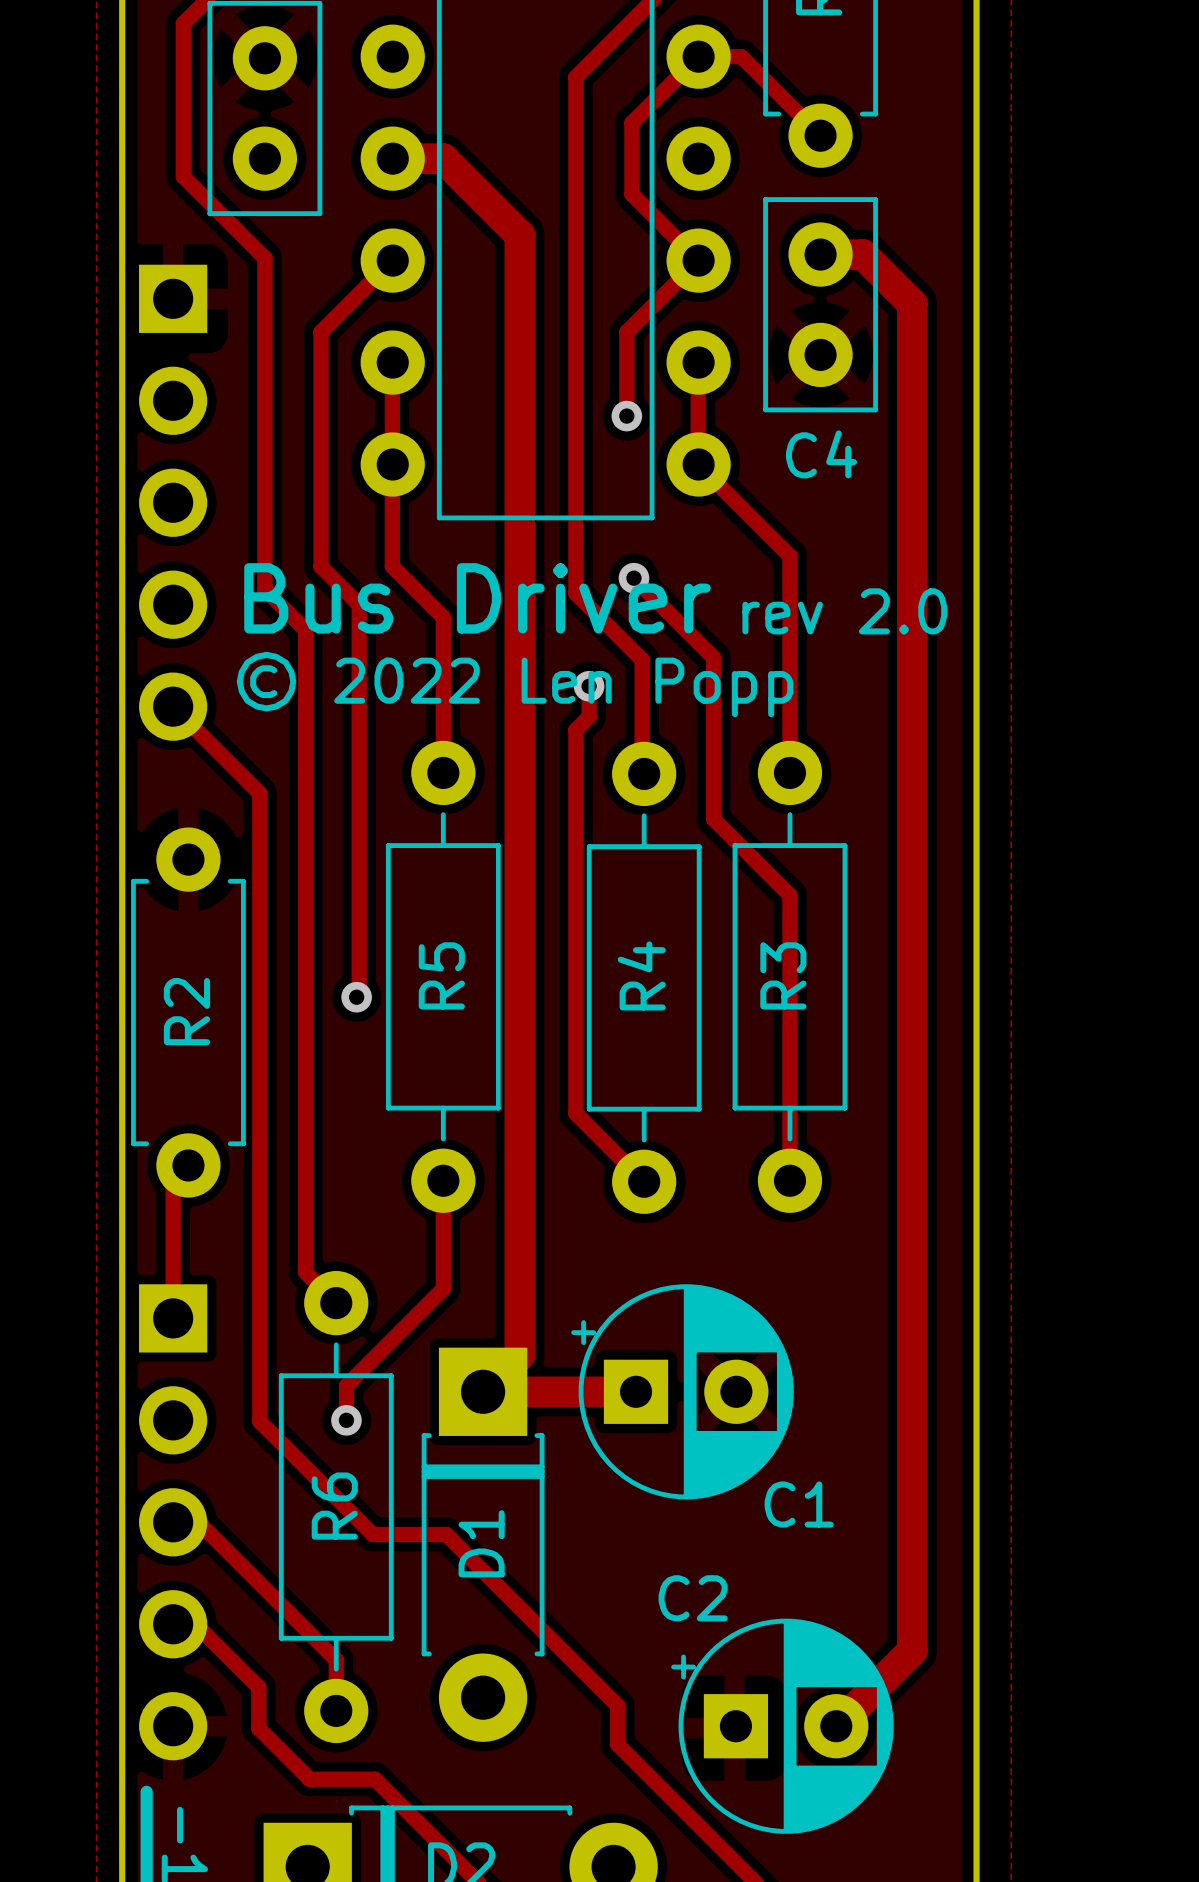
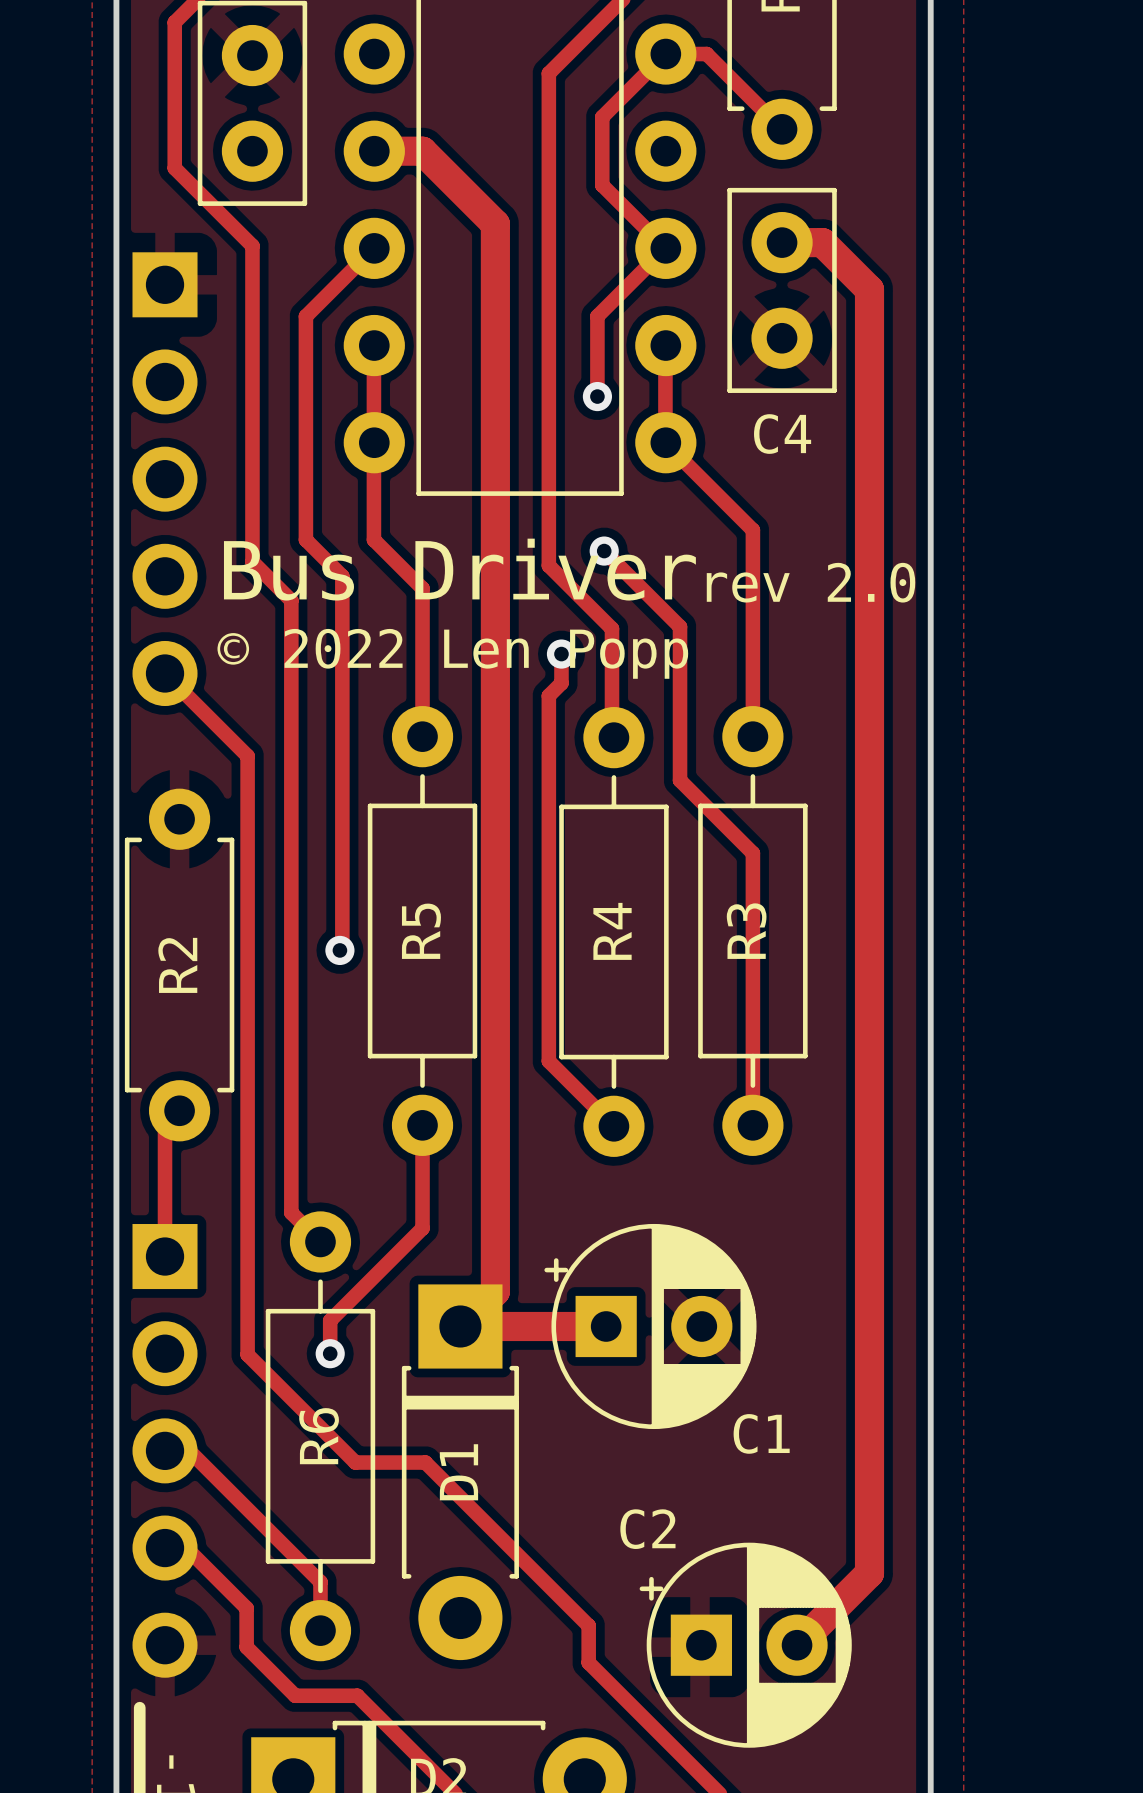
C2 name position: C2 (693, 1598) -> C2 (647, 1529)

